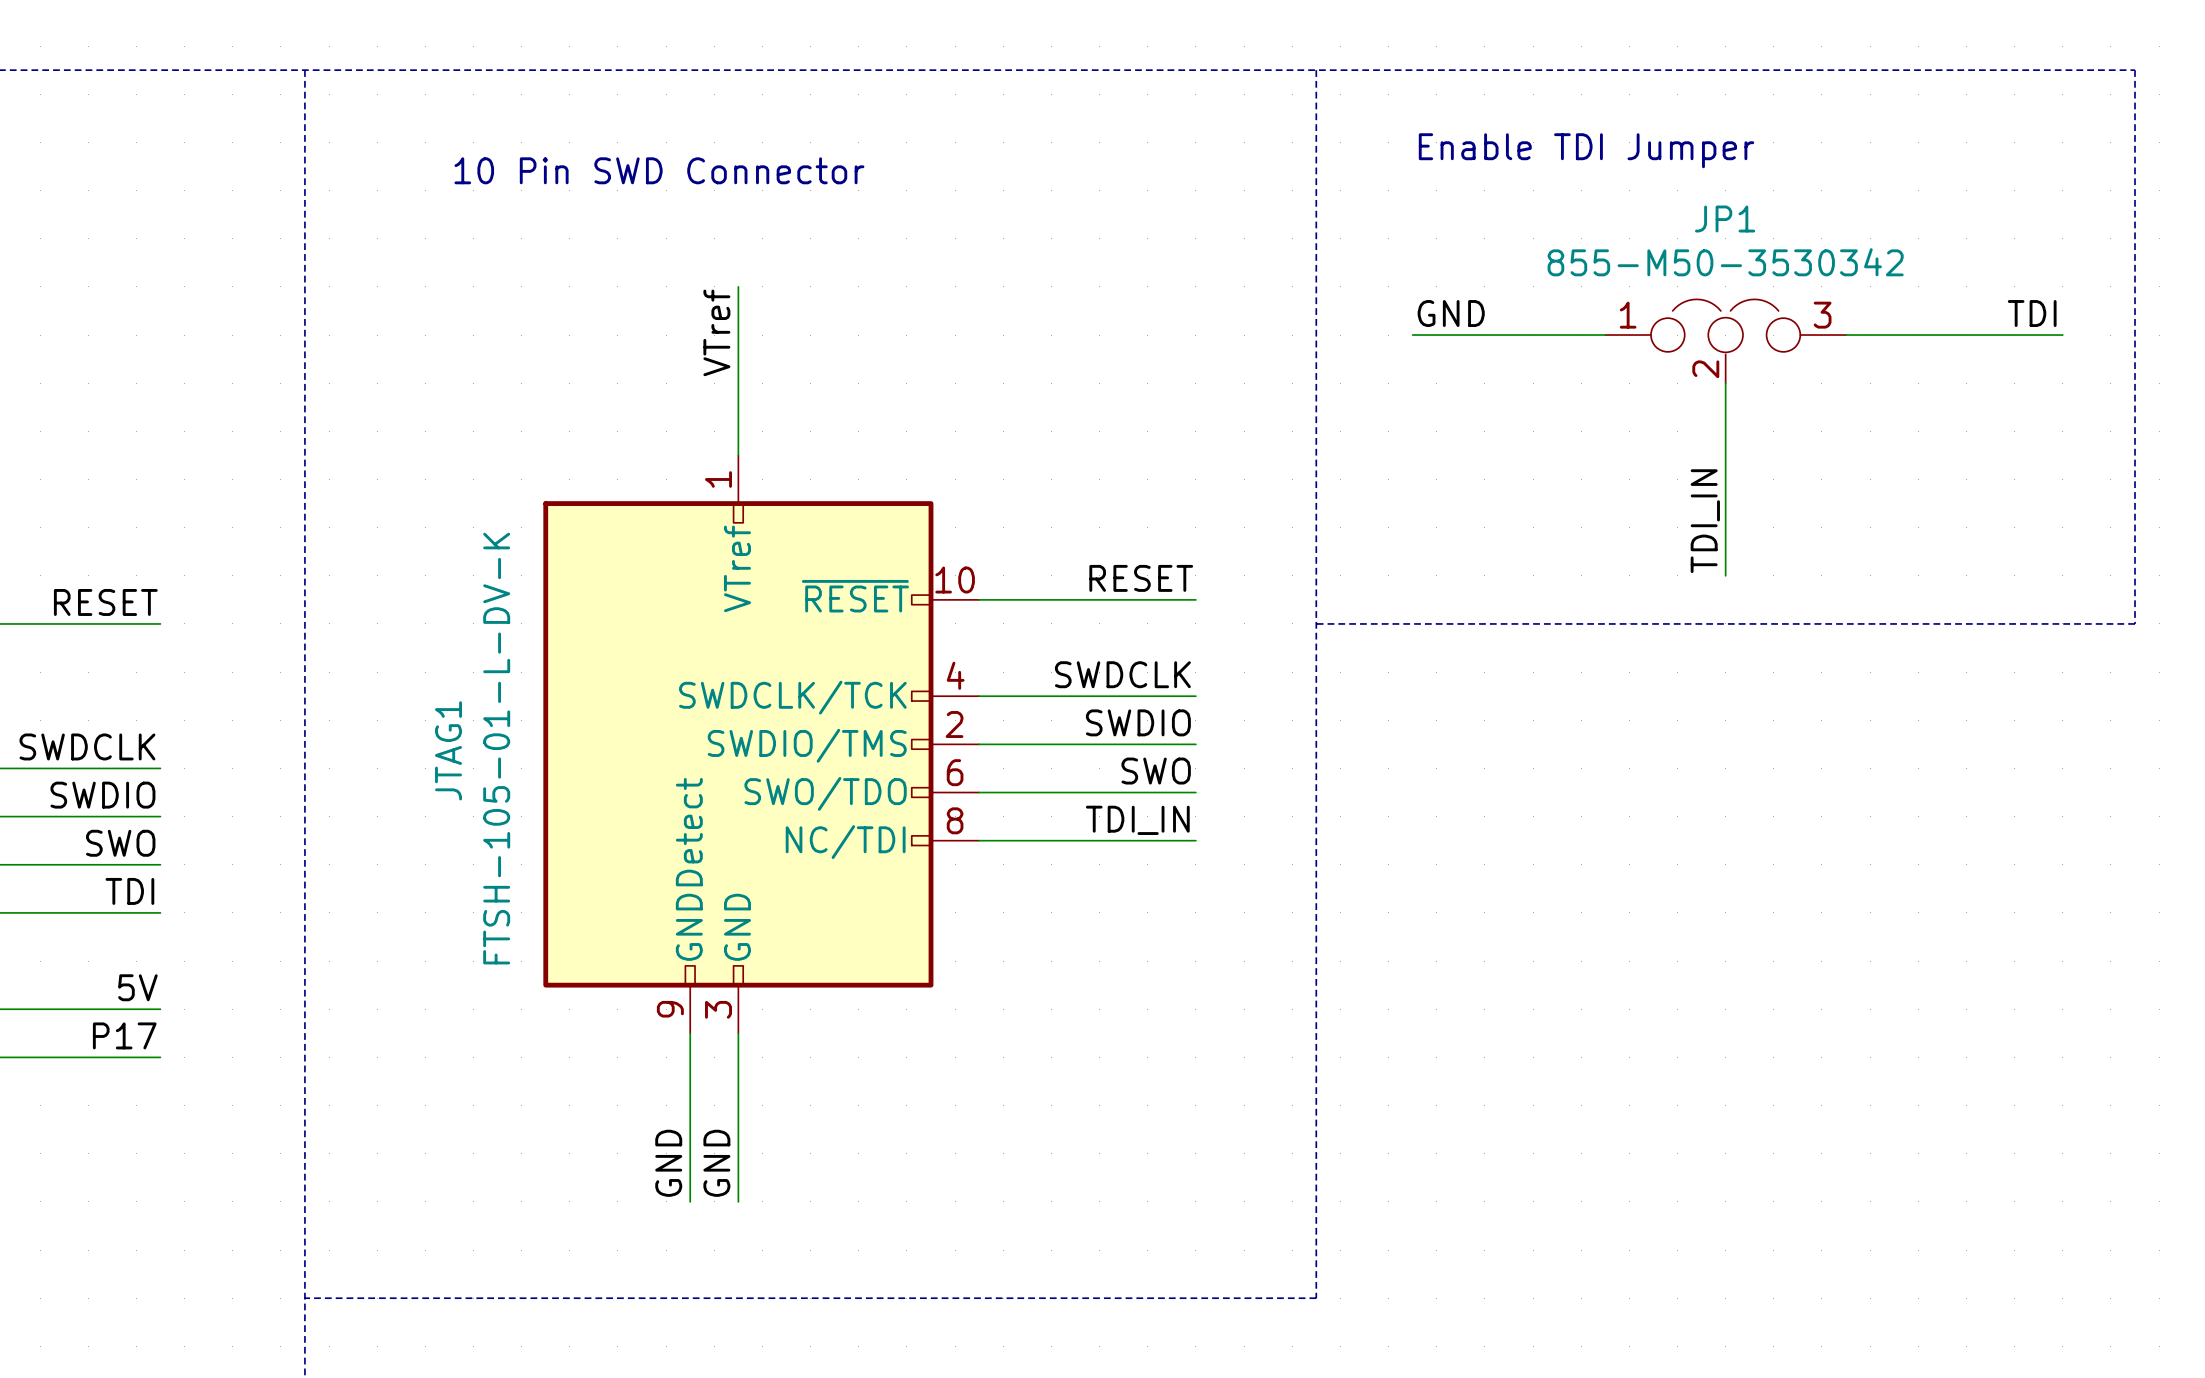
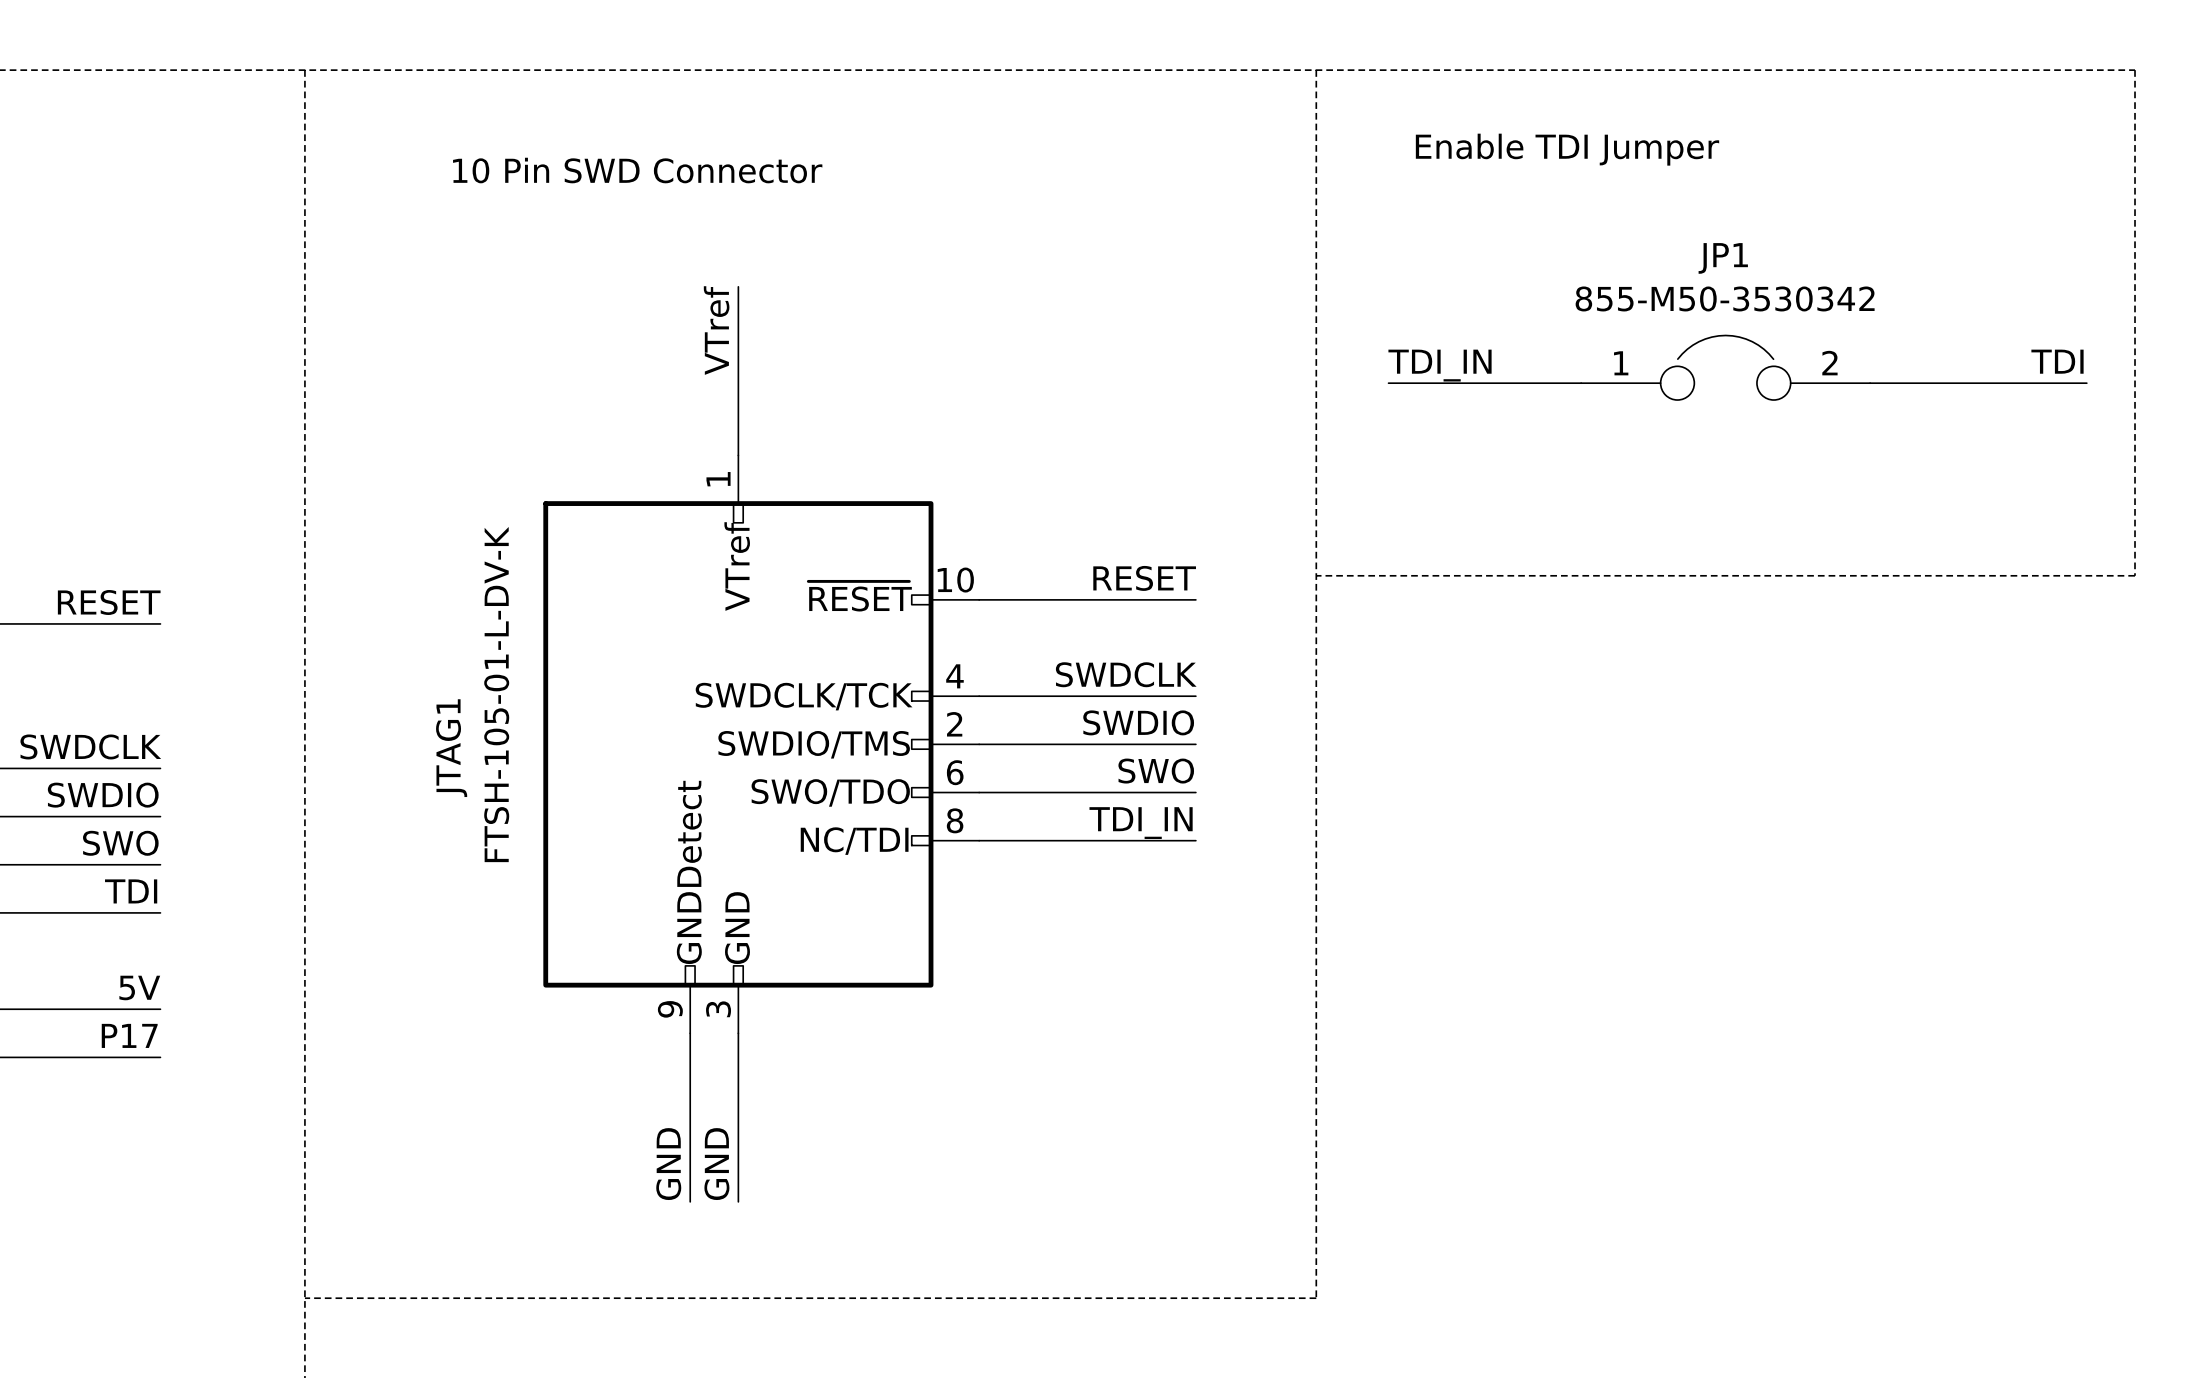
JP1 symbol: [1605, 299, 1847, 384] -> [1581, 335, 1871, 401]
label: GND (1451, 313) -> none
label position: TDI (2032, 313) -> TDI (2057, 361)
wire: (1412, 335) (1605, 335) -> (1388, 383) (1581, 383)
wire: (1846, 335) (2062, 335) -> (1870, 383) (2086, 383)
wire: (1725, 383) (1725, 575) -> none
label rotation: 0° (1705, 521) -> 90° clockwise (1440, 365)
label position: TDI_IN (1705, 521) -> TDI_IN (1440, 365)
line: (2135, 575) (2135, 623) (1316, 623) -> (2135, 575) (1316, 575)

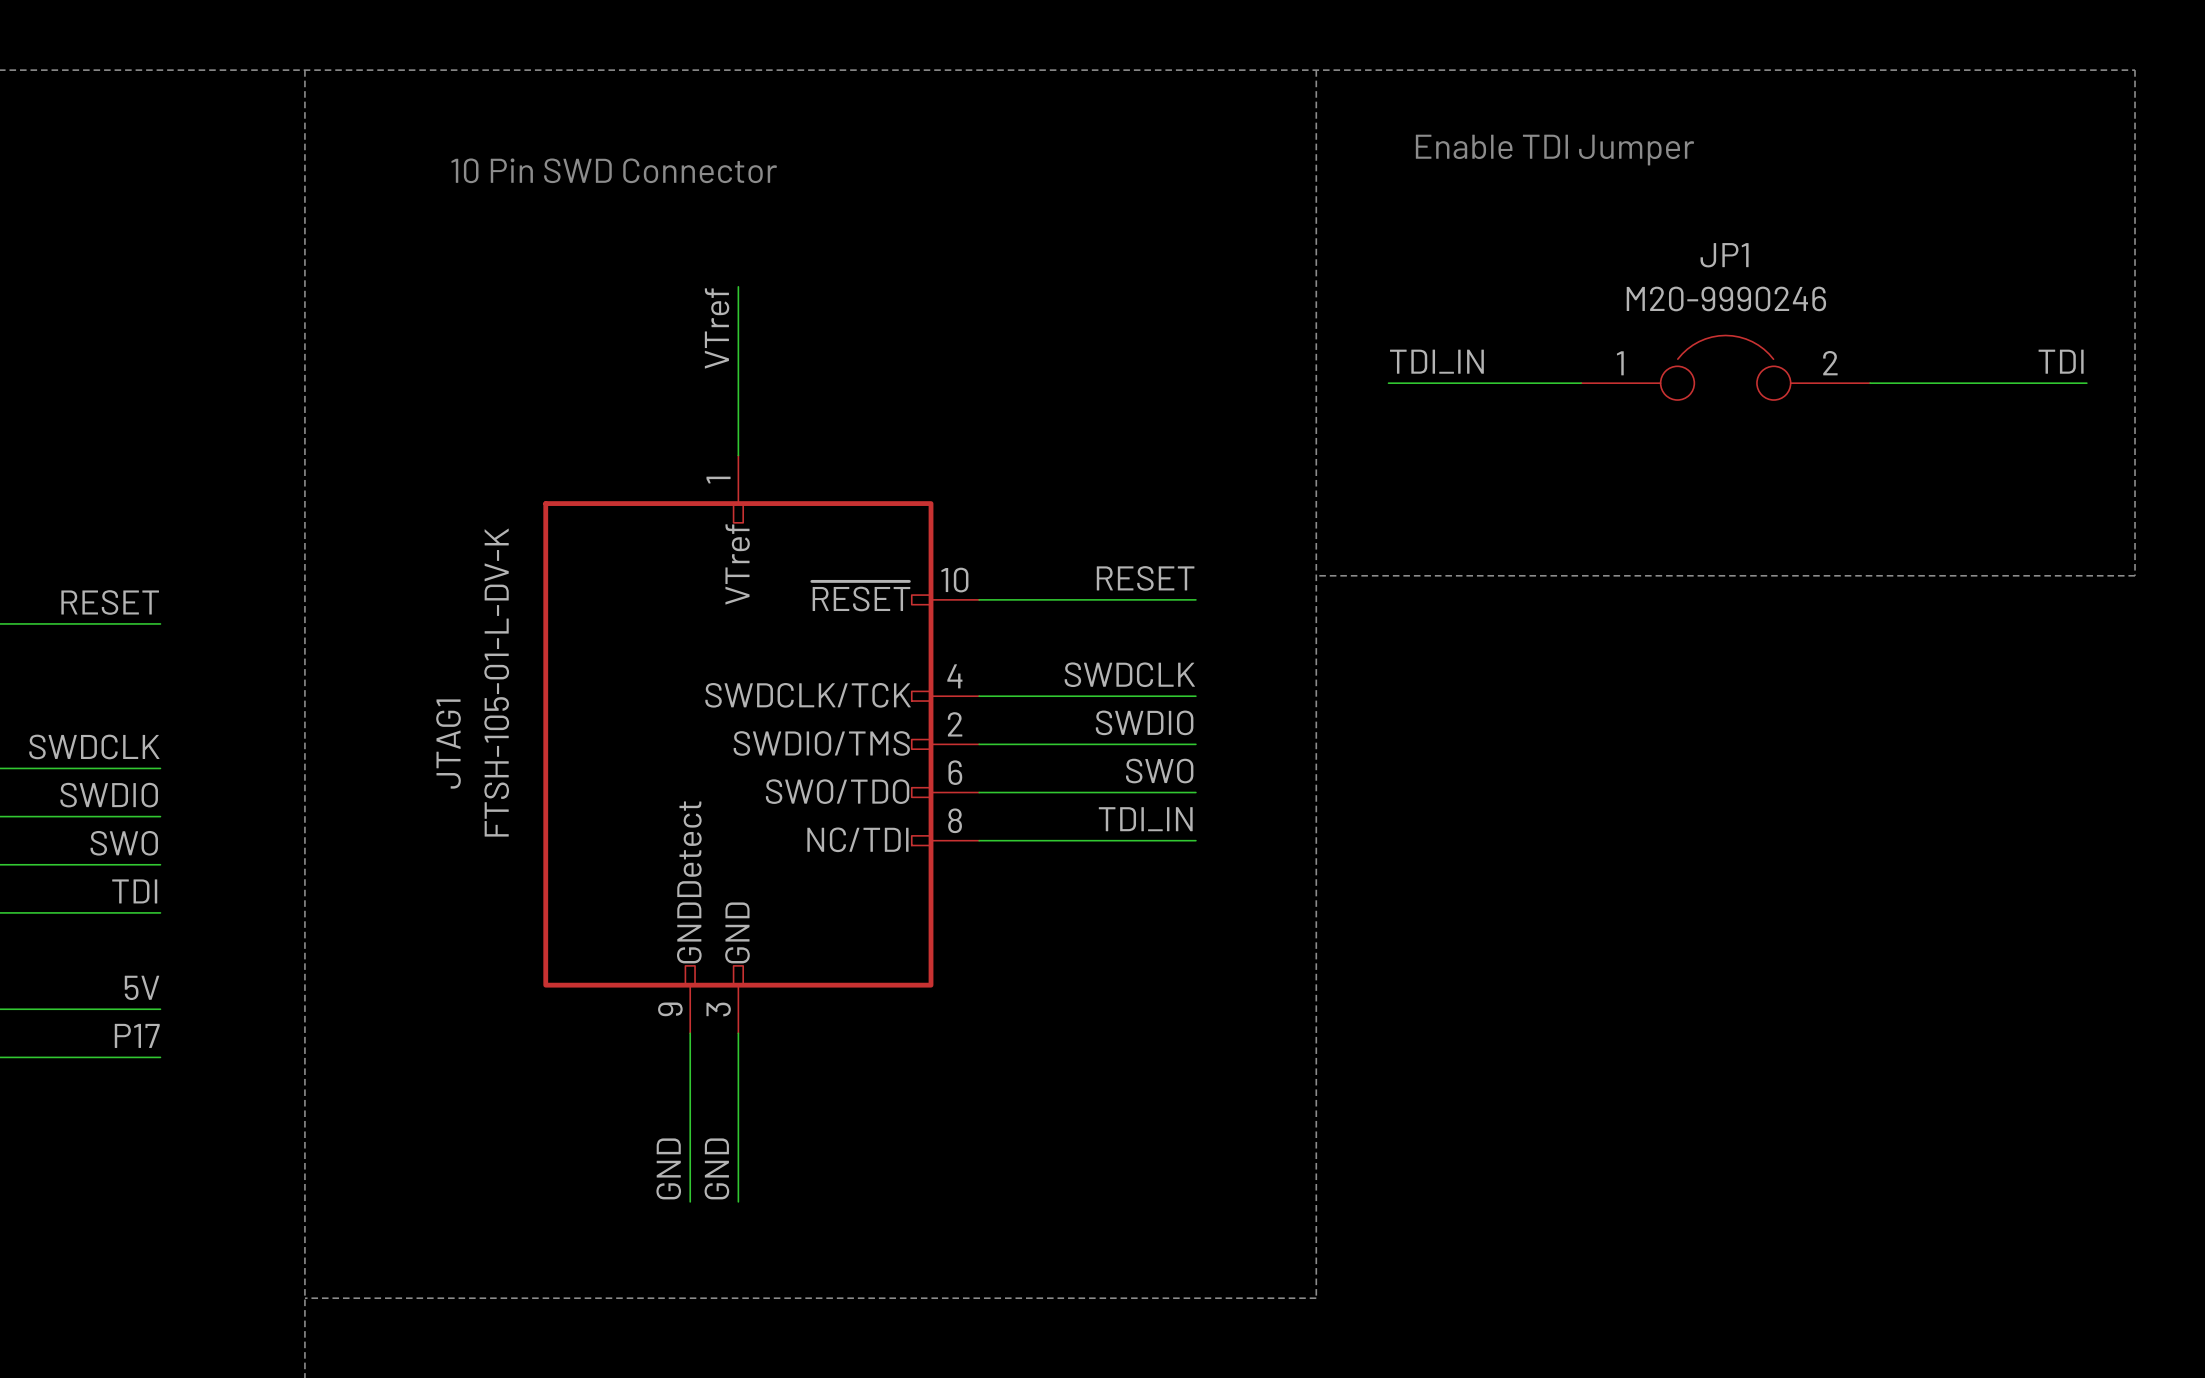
JP1 value: 855-M50-3530342 (1725, 298) -> M20-9990246 (1726, 298)

